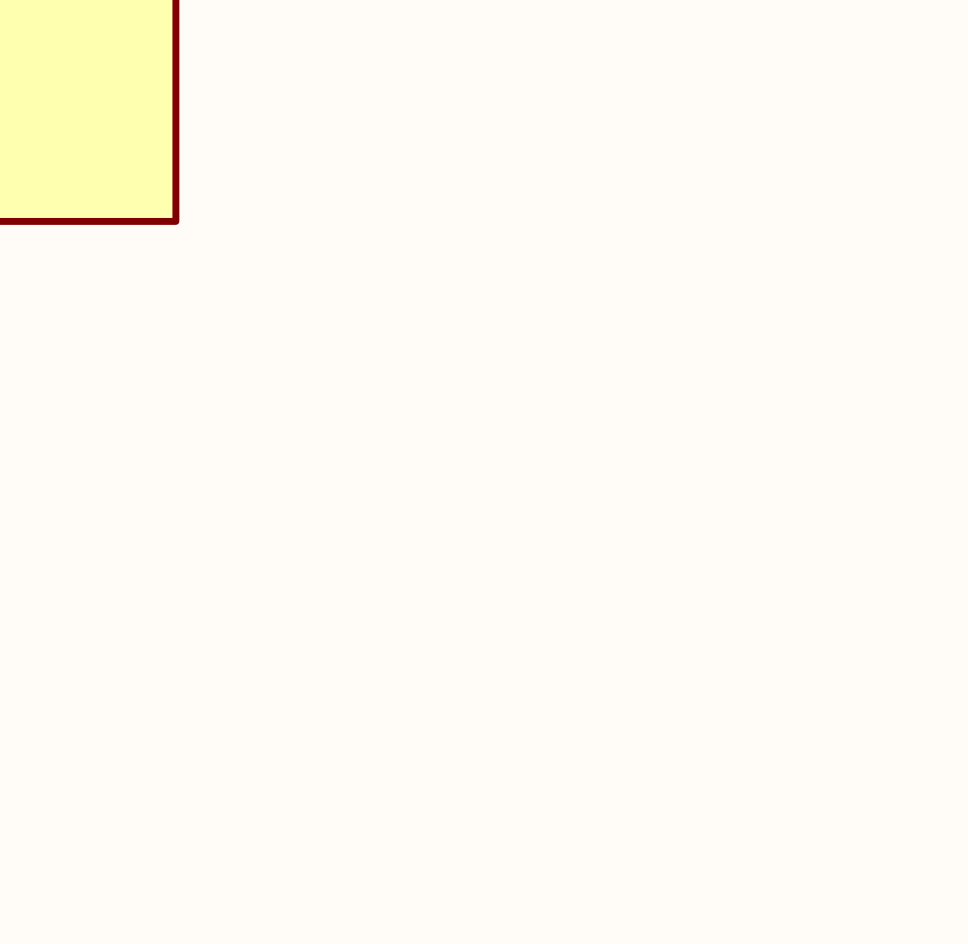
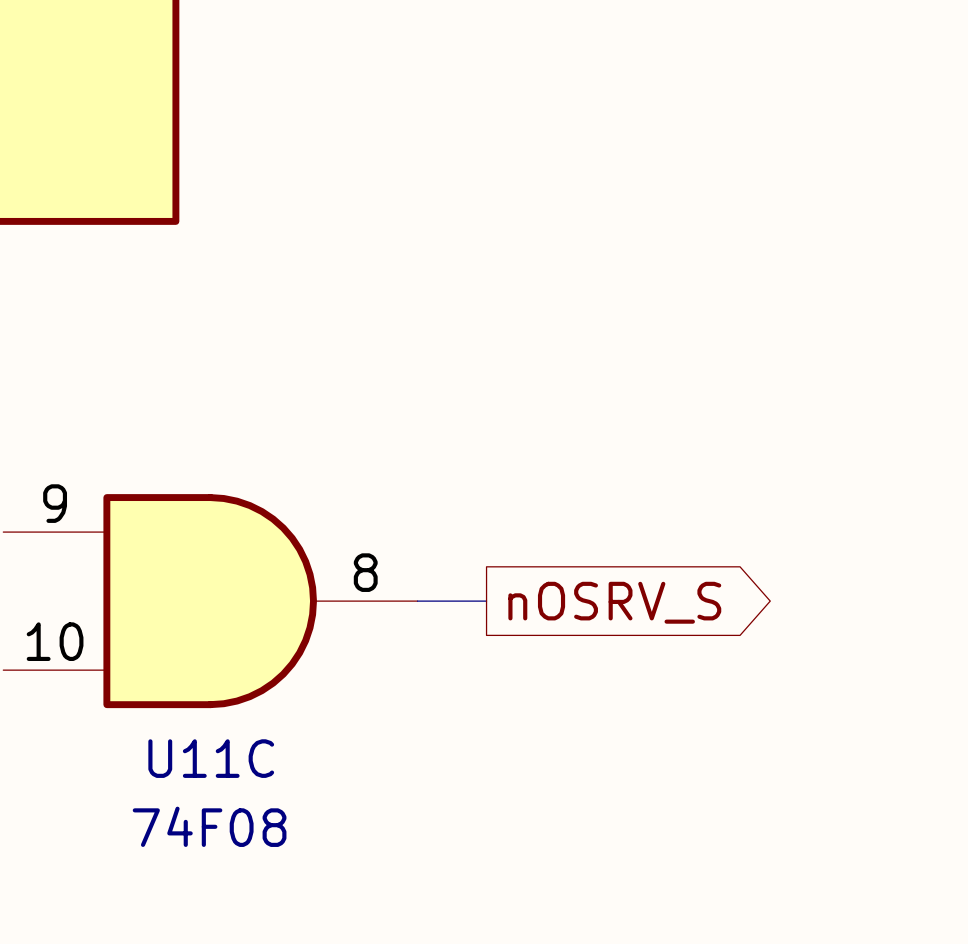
U11C: none -> 74F08 (210, 601)
wire: none -> (417, 601) (486, 601)
global label: none -> nOSRV_S (614, 602)

